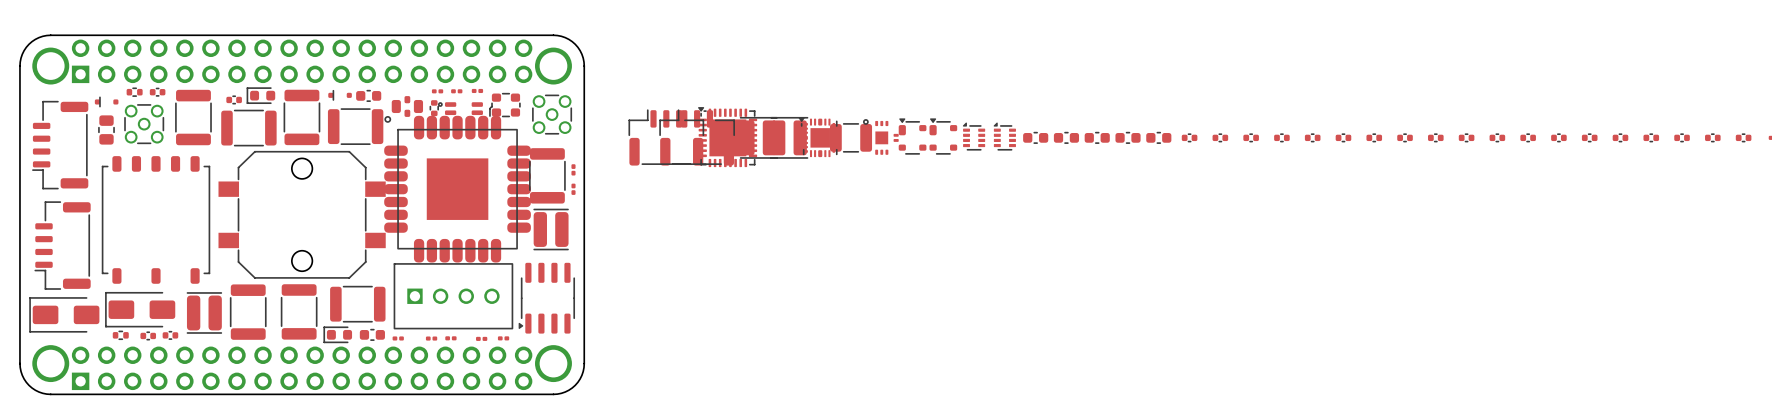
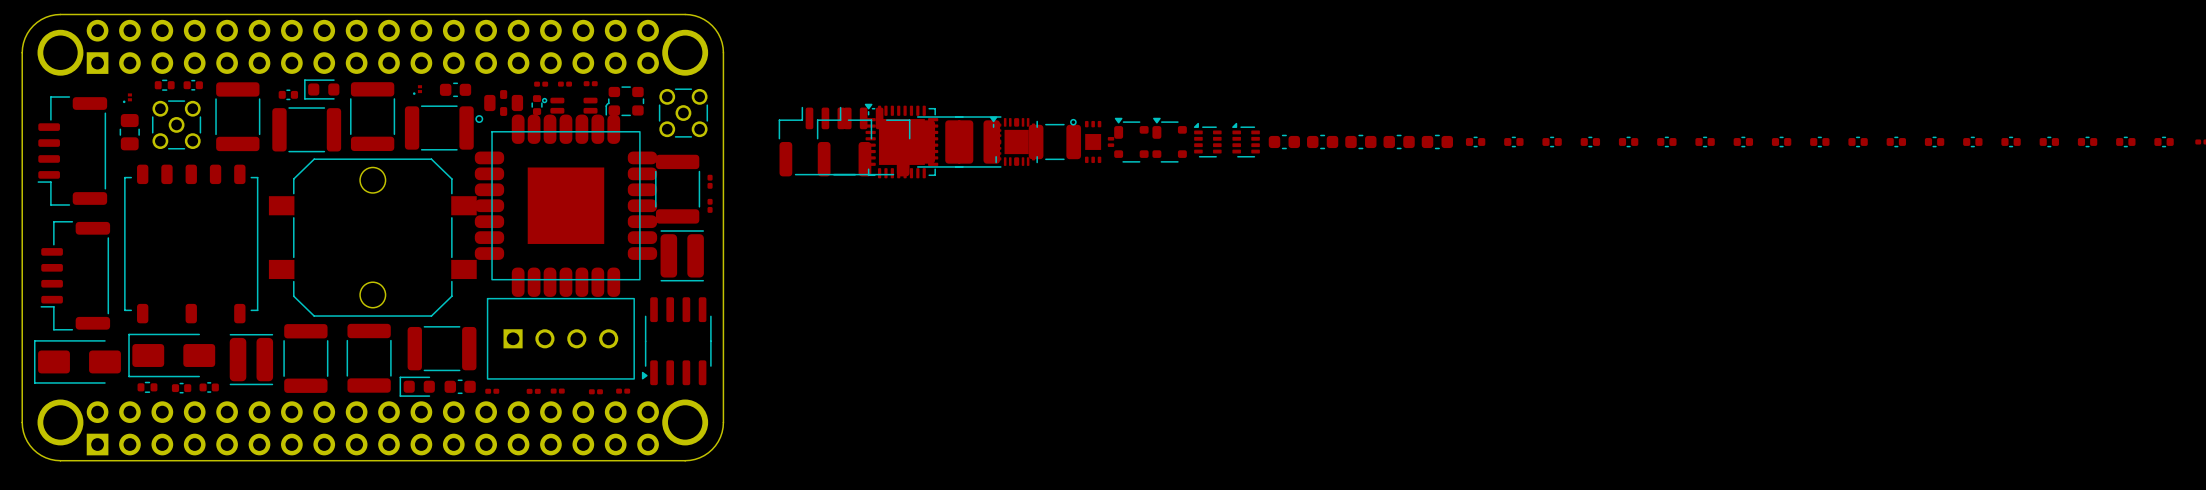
part footprint: [328, 90, 352, 101] -> [412, 85, 423, 95]
part footprint: [94, 96, 119, 108] -> [122, 93, 132, 104]

